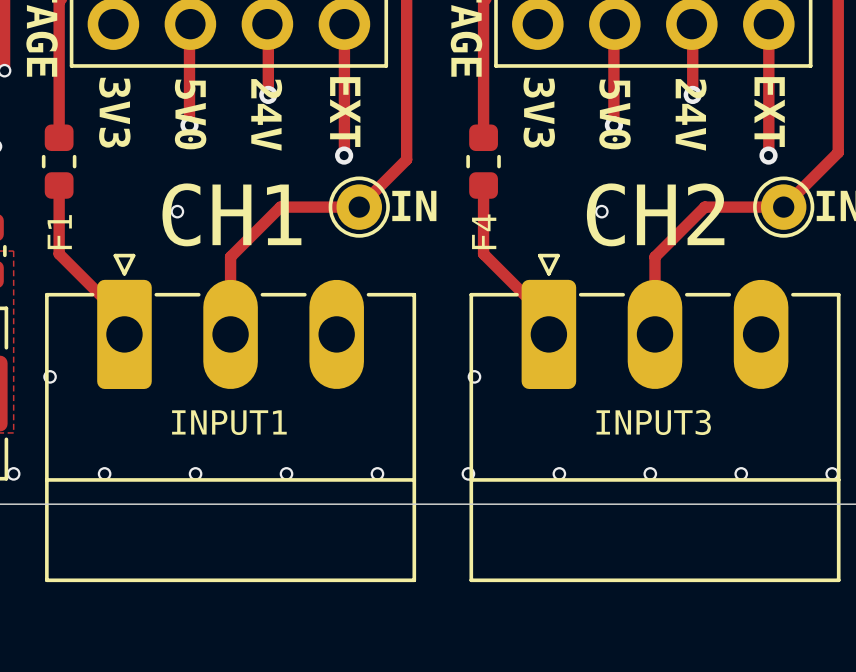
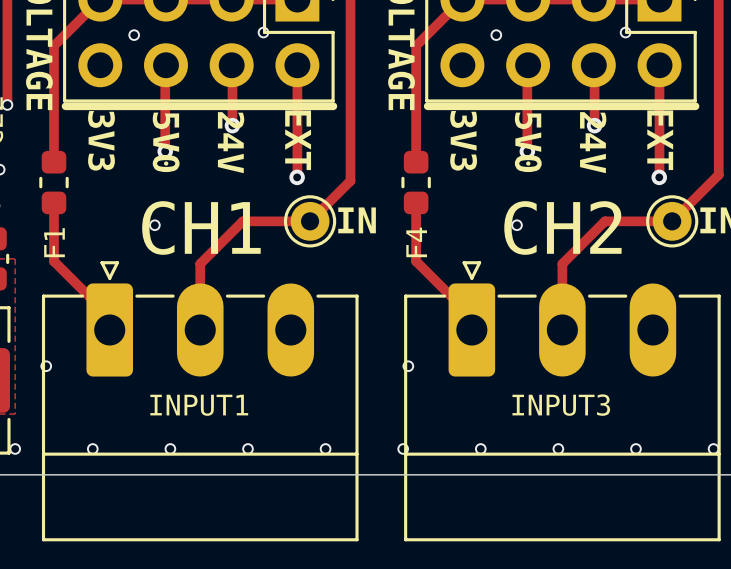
line: none -> (65, 106) (333, 106)
line: none -> (427, 106) (695, 106)

